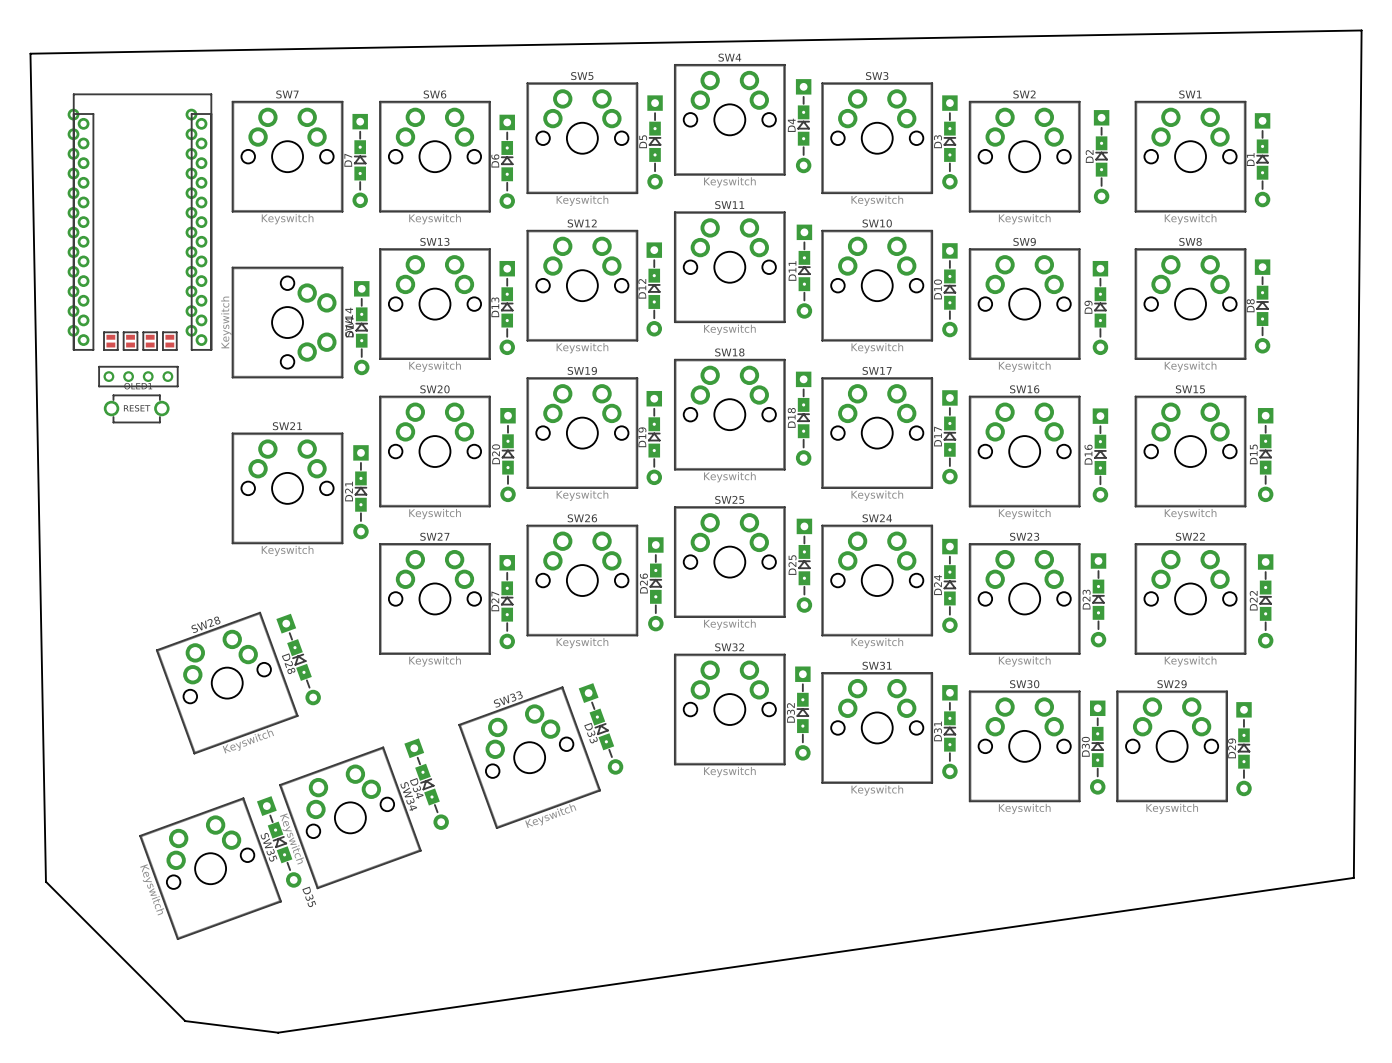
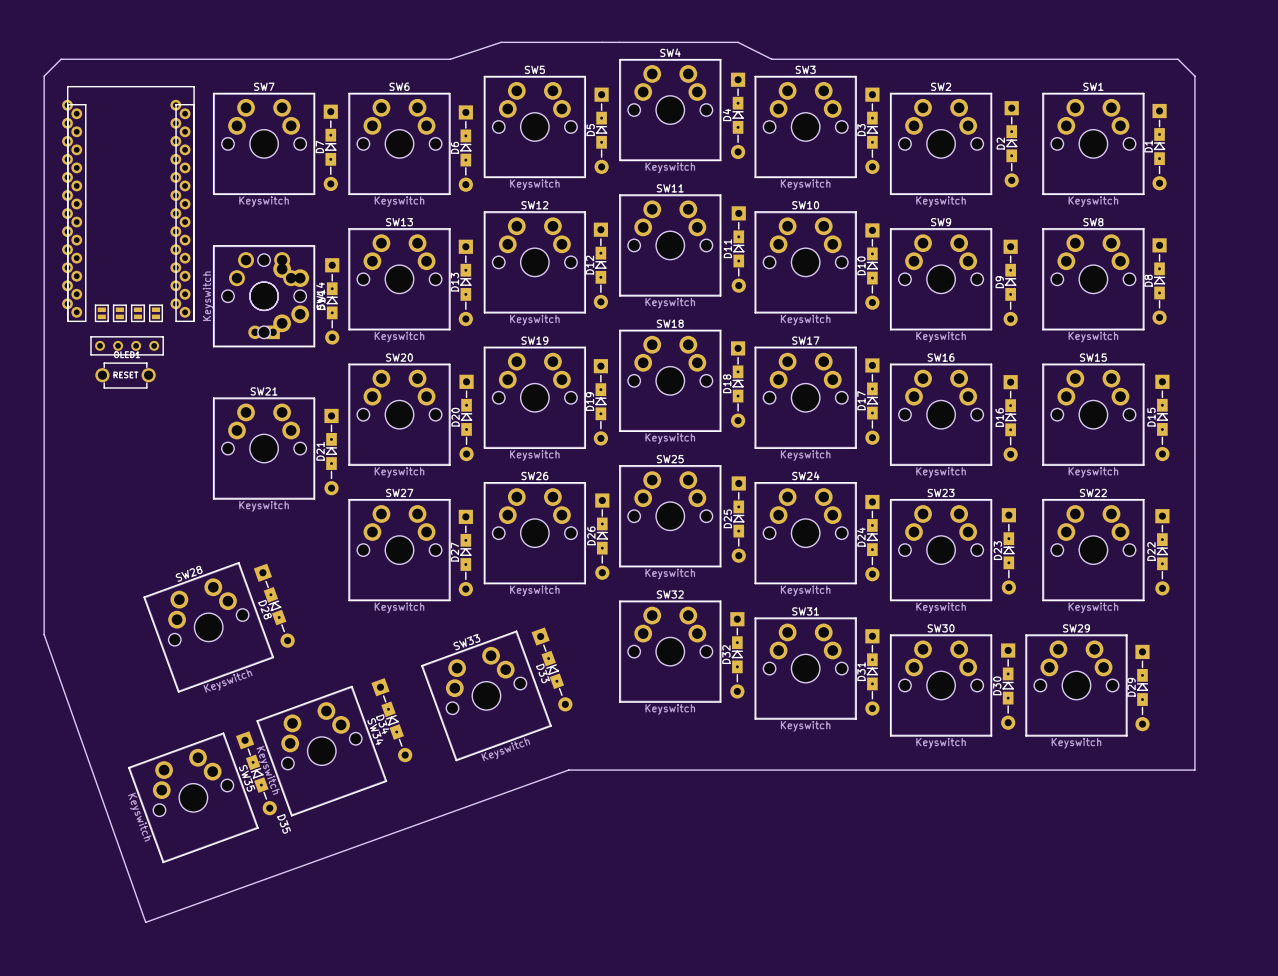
board edge: (1361, 30) (30, 53) (45, 881) (185, 1021) (278, 1032) (1353, 877) (1361, 30) -> (501, 42) (450, 59) (61, 59) (44, 76) (44, 634) (145, 922) (568, 770) (1194, 770) (1194, 76) (1178, 59) (771, 59) (738, 42) (501, 42)
part: none -> (264, 295)

